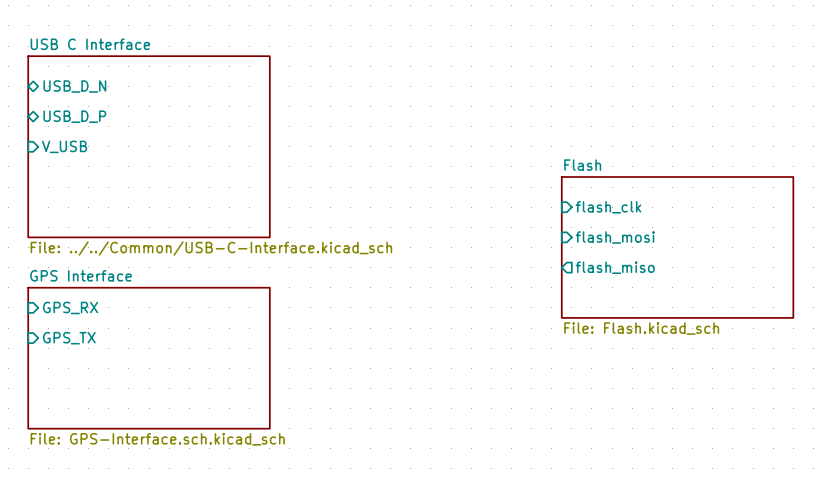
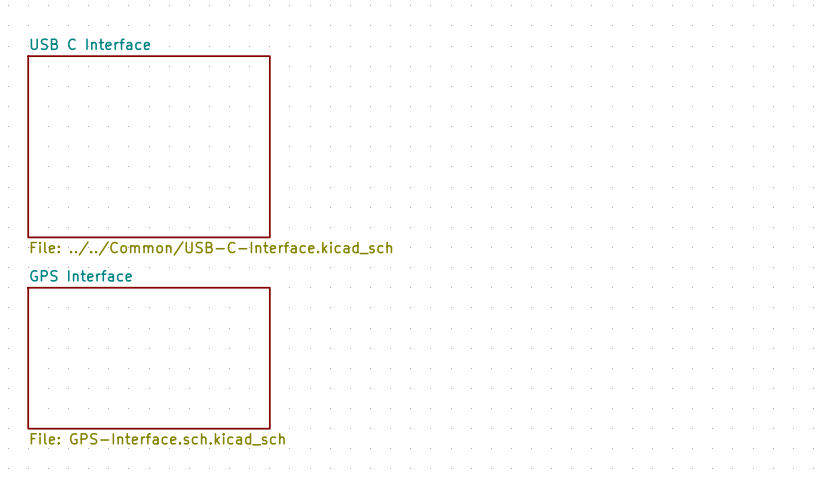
sheet pin: USB_D_N (74, 86) -> none
sheet pin: USB_D_P (74, 116) -> none
sheet pin: V_USB (64, 146) -> none
sheet pin: flash_clk (608, 207) -> none
sheet pin: flash_mosi (615, 237) -> none
sheet Flash: File: Flash.kicad_sch (677, 247) -> none
sheet pin: flash_miso (615, 267) -> none
sheet pin: GPS_RX (70, 307) -> none
sheet pin: GPS_TX (69, 338) -> none

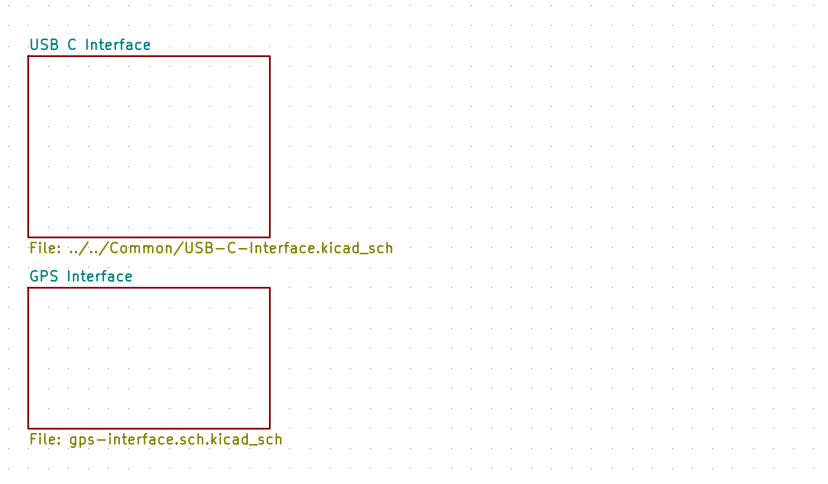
sheet GPS Interface value: File: GPS-Interface.sch.kicad_sch (157, 439) -> File: gps-interface.sch.kicad_sch (156, 440)

